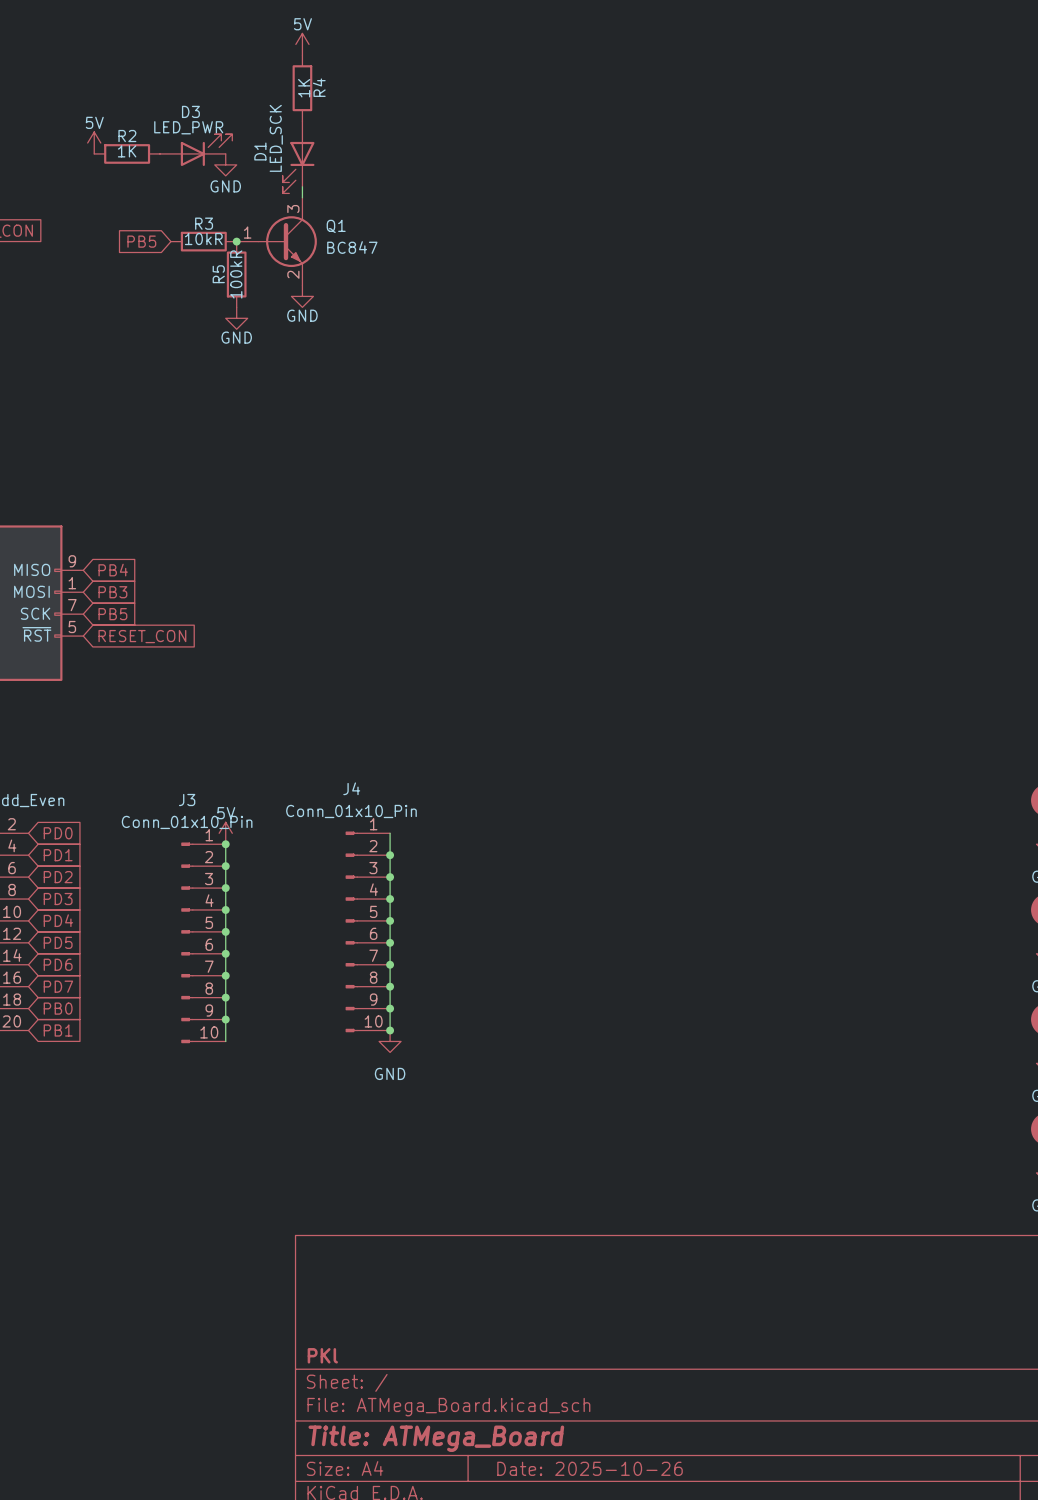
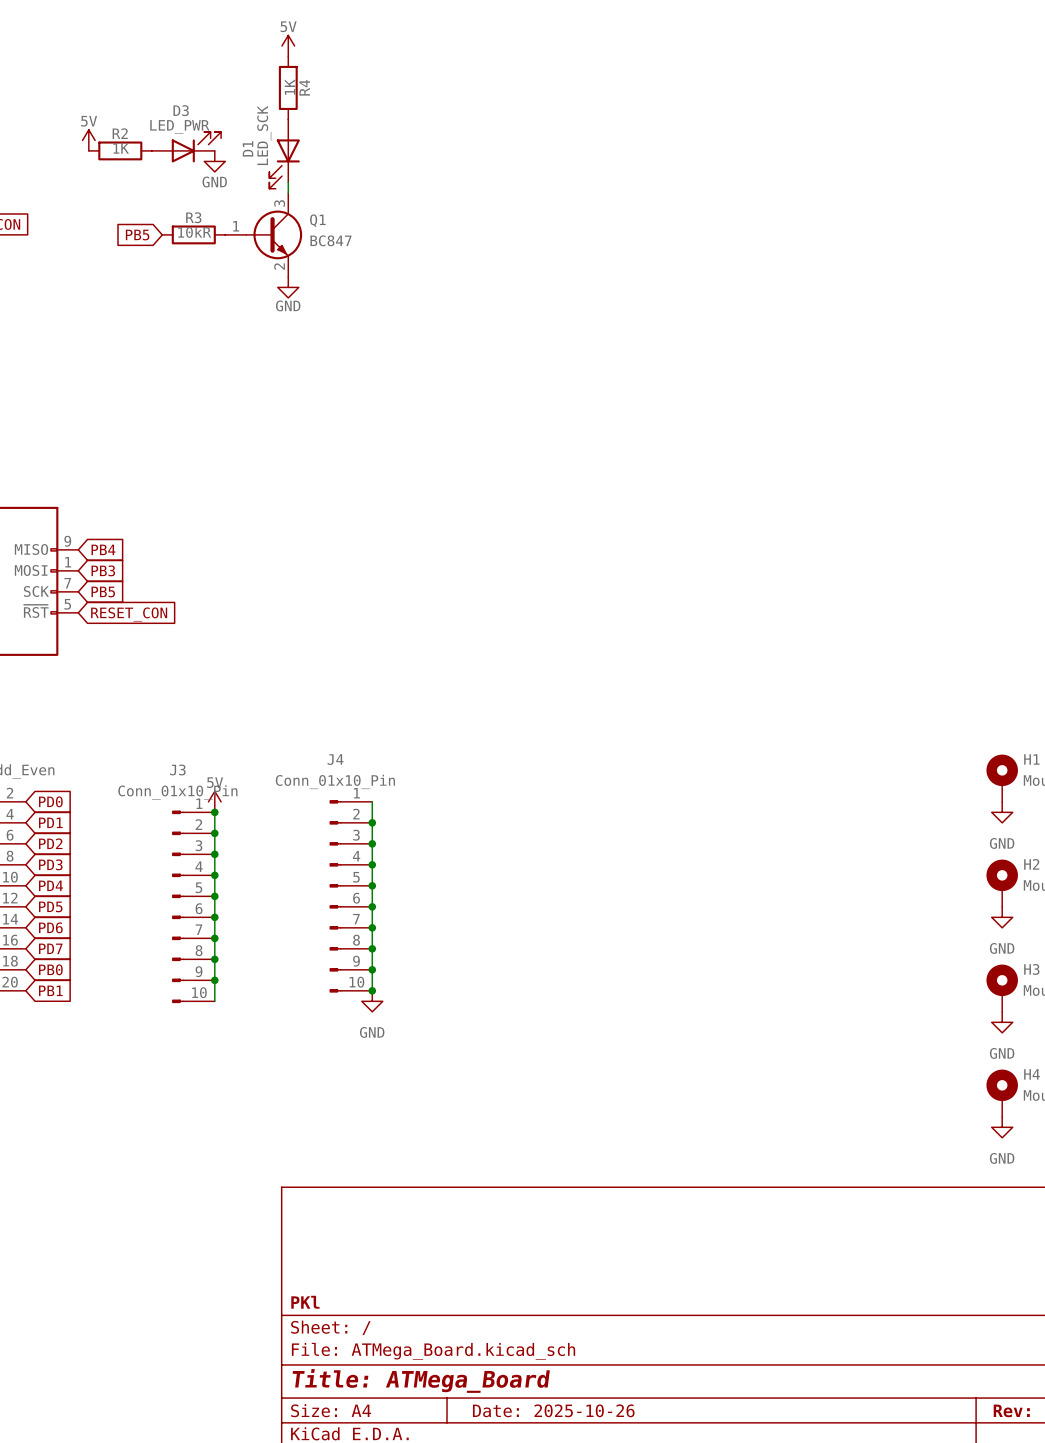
junction: (236, 241) -> none
R5: 100kR (236, 274) -> none
power symbol: GND (236, 318) -> none

